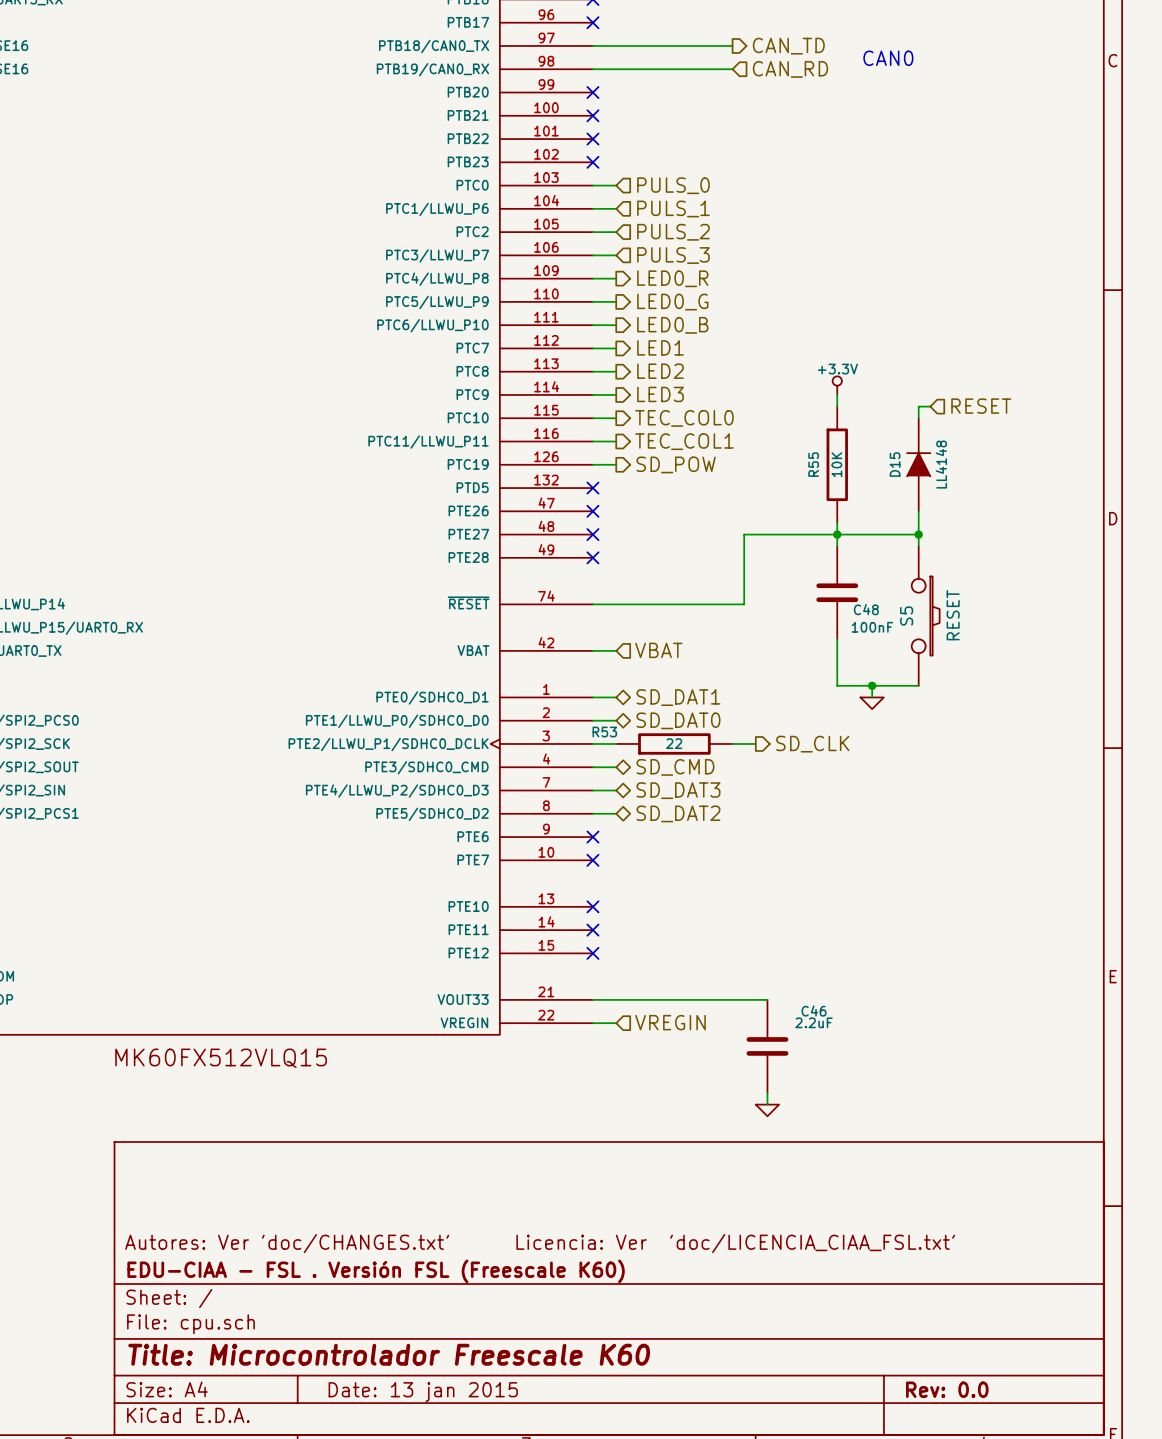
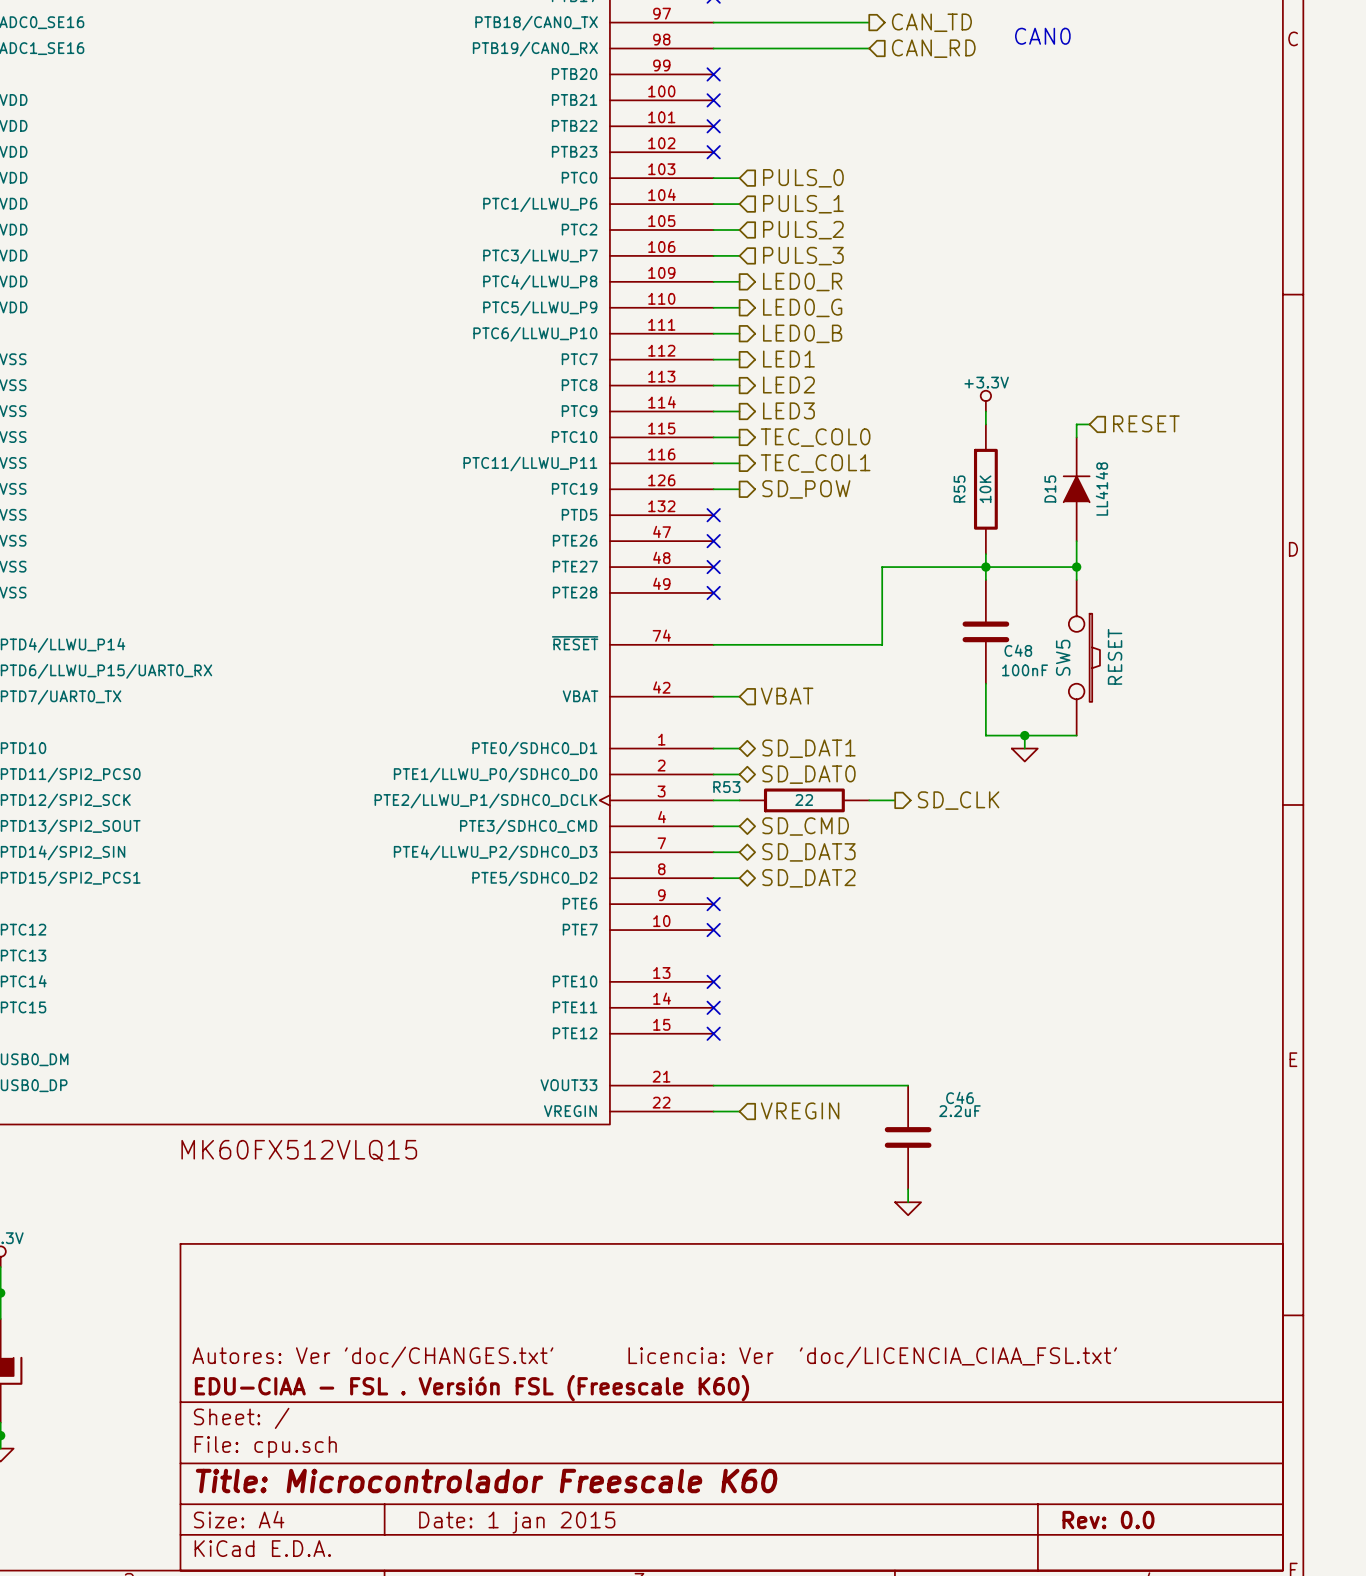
S5 name: S5 (906, 616) -> SW5 (1063, 657)
title block: Date: 13 jan 2015 (423, 1392) -> Date: 1 jan 2015 (517, 1522)

